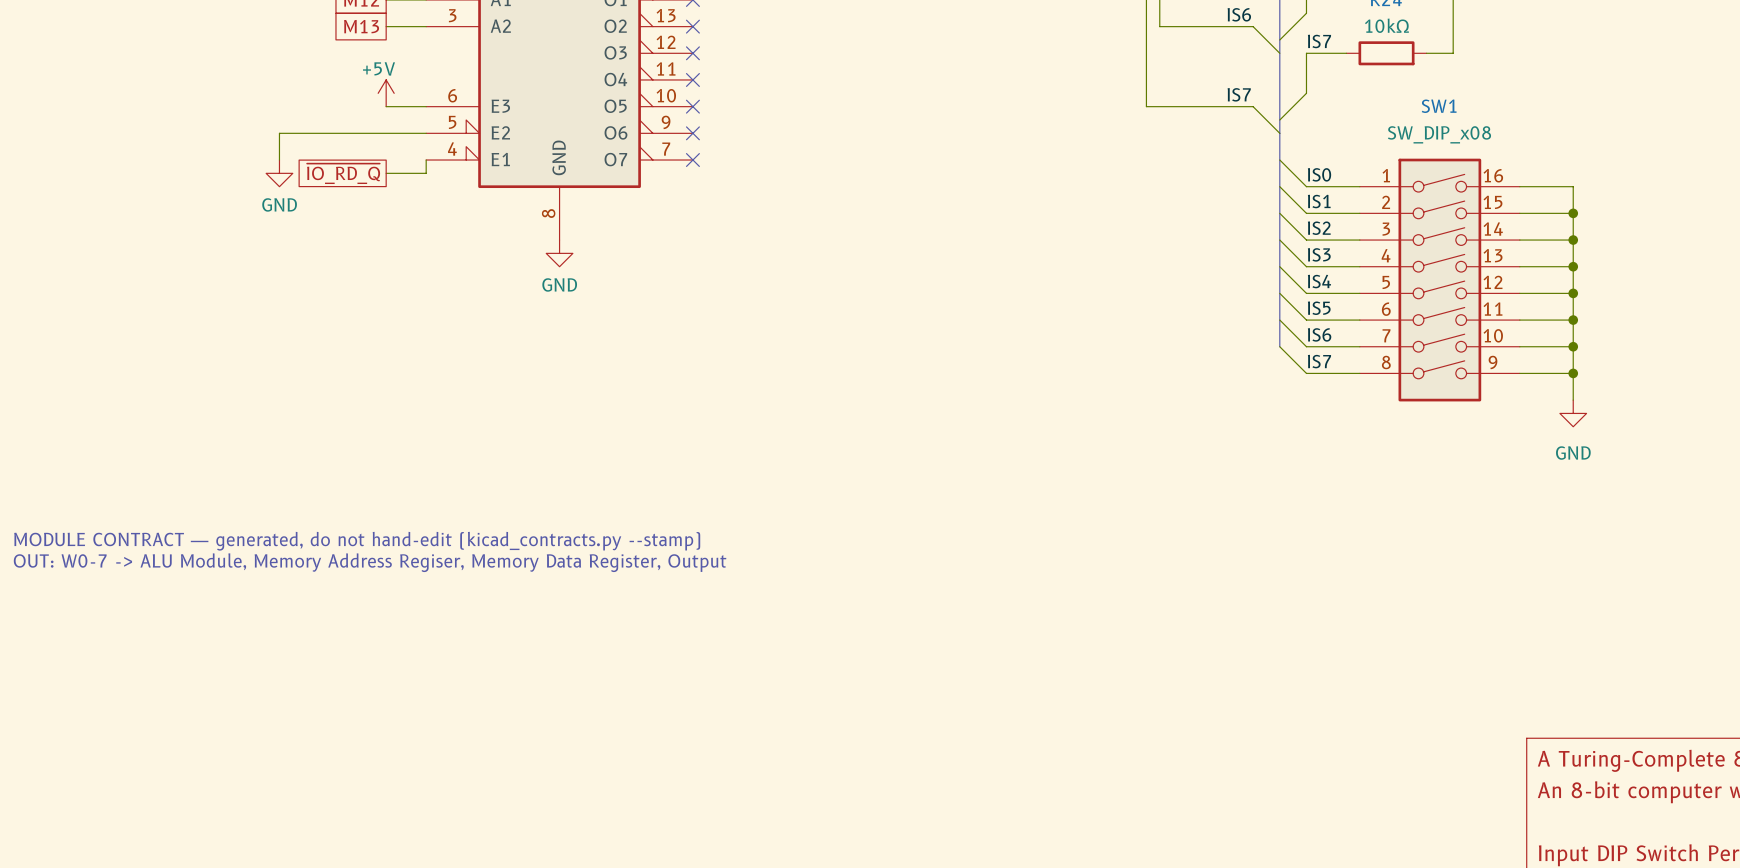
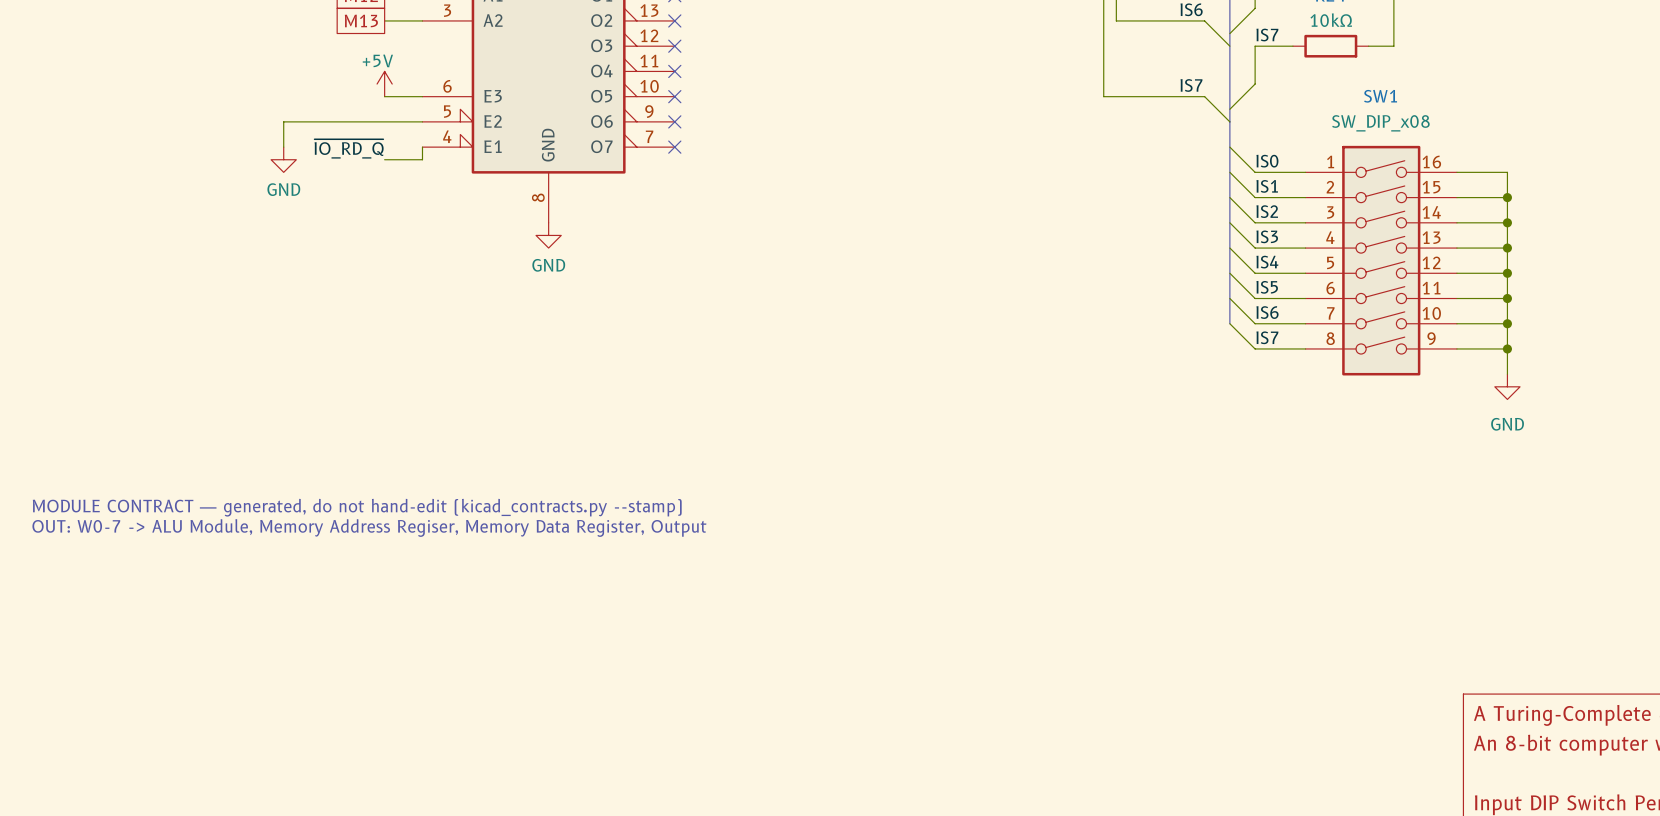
label: none -> ~{IO_RD_Q} (349, 148)
global label: ~{IO_RD_Q} (343, 173) -> none

